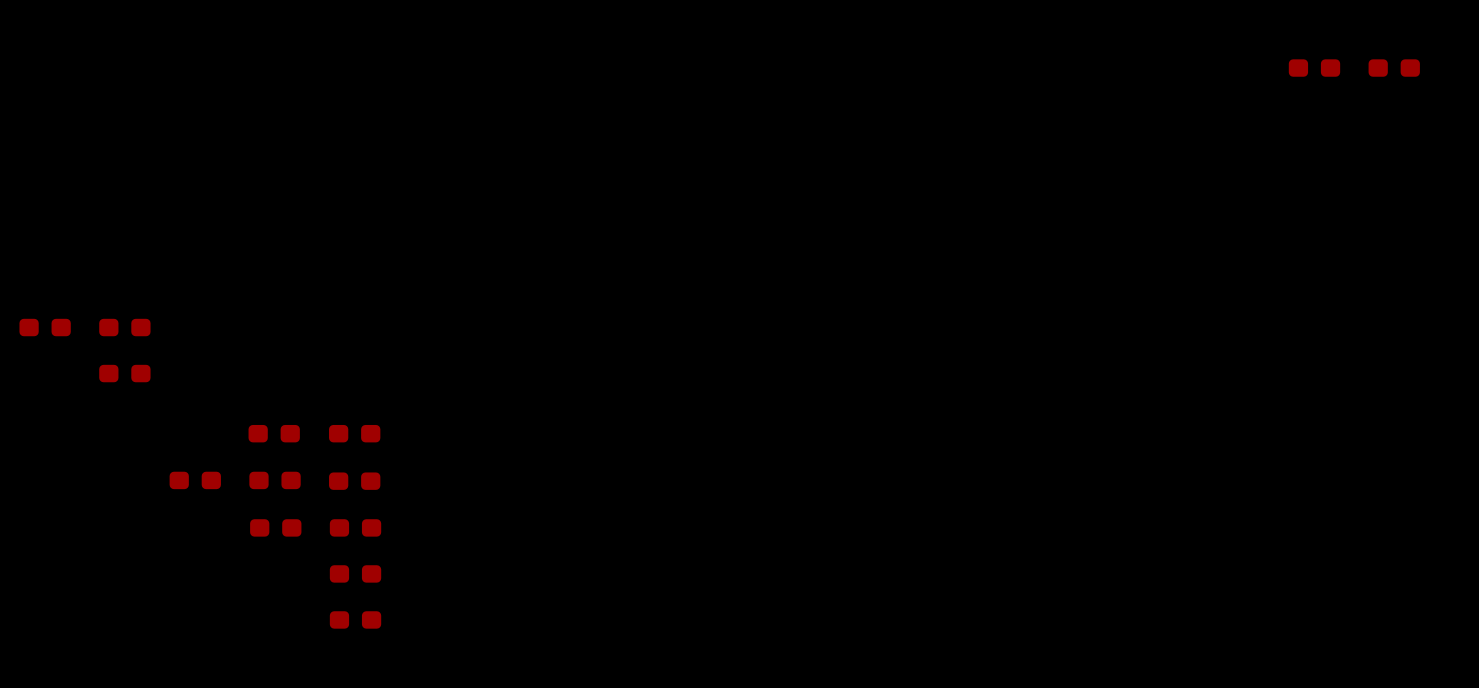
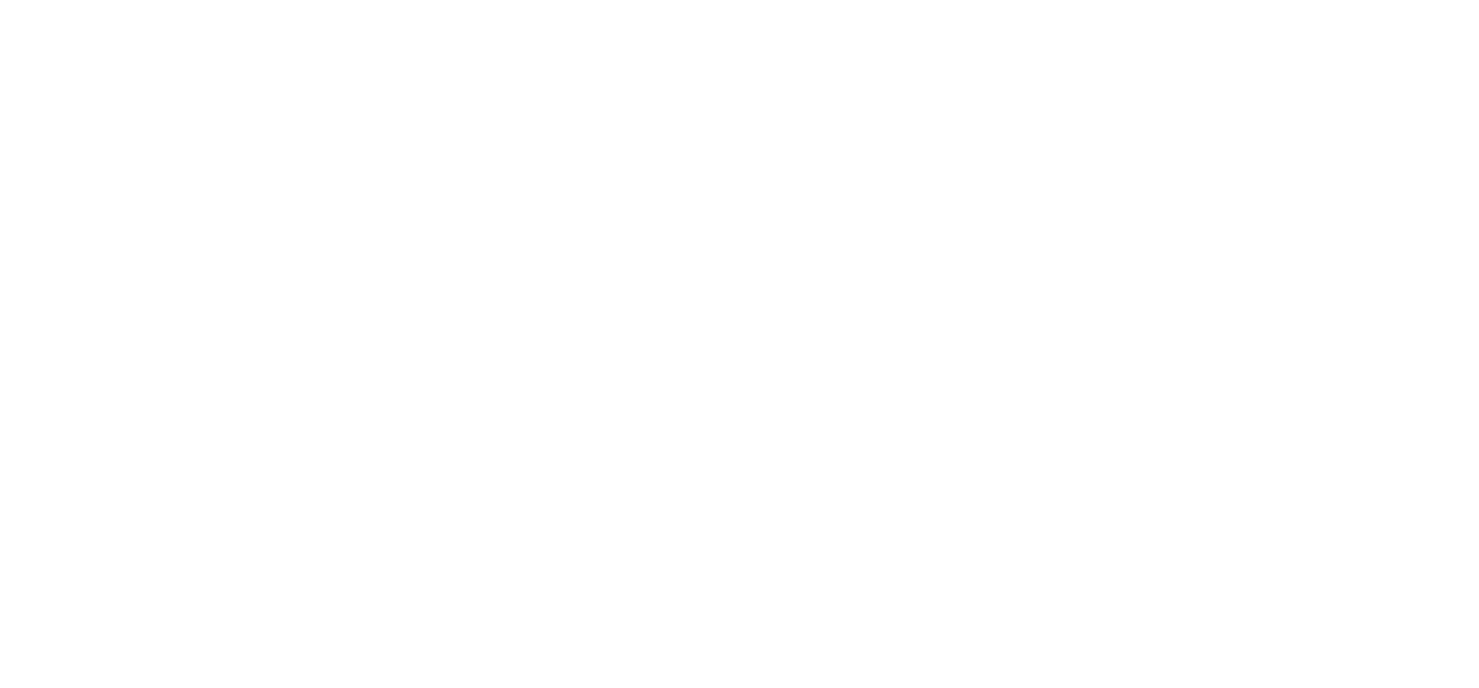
part: (1314, 68) -> none
part: (1394, 68) -> none
part: (45, 327) -> none
part: (124, 327) -> none
part: (124, 373) -> none
part: (274, 433) -> none
part: (354, 433) -> none
part: (195, 480) -> none
part: (275, 480) -> none
part: (354, 481) -> none
part: (275, 527) -> none
part: (355, 527) -> none
part: (355, 573) -> none
part: (355, 619) -> none

